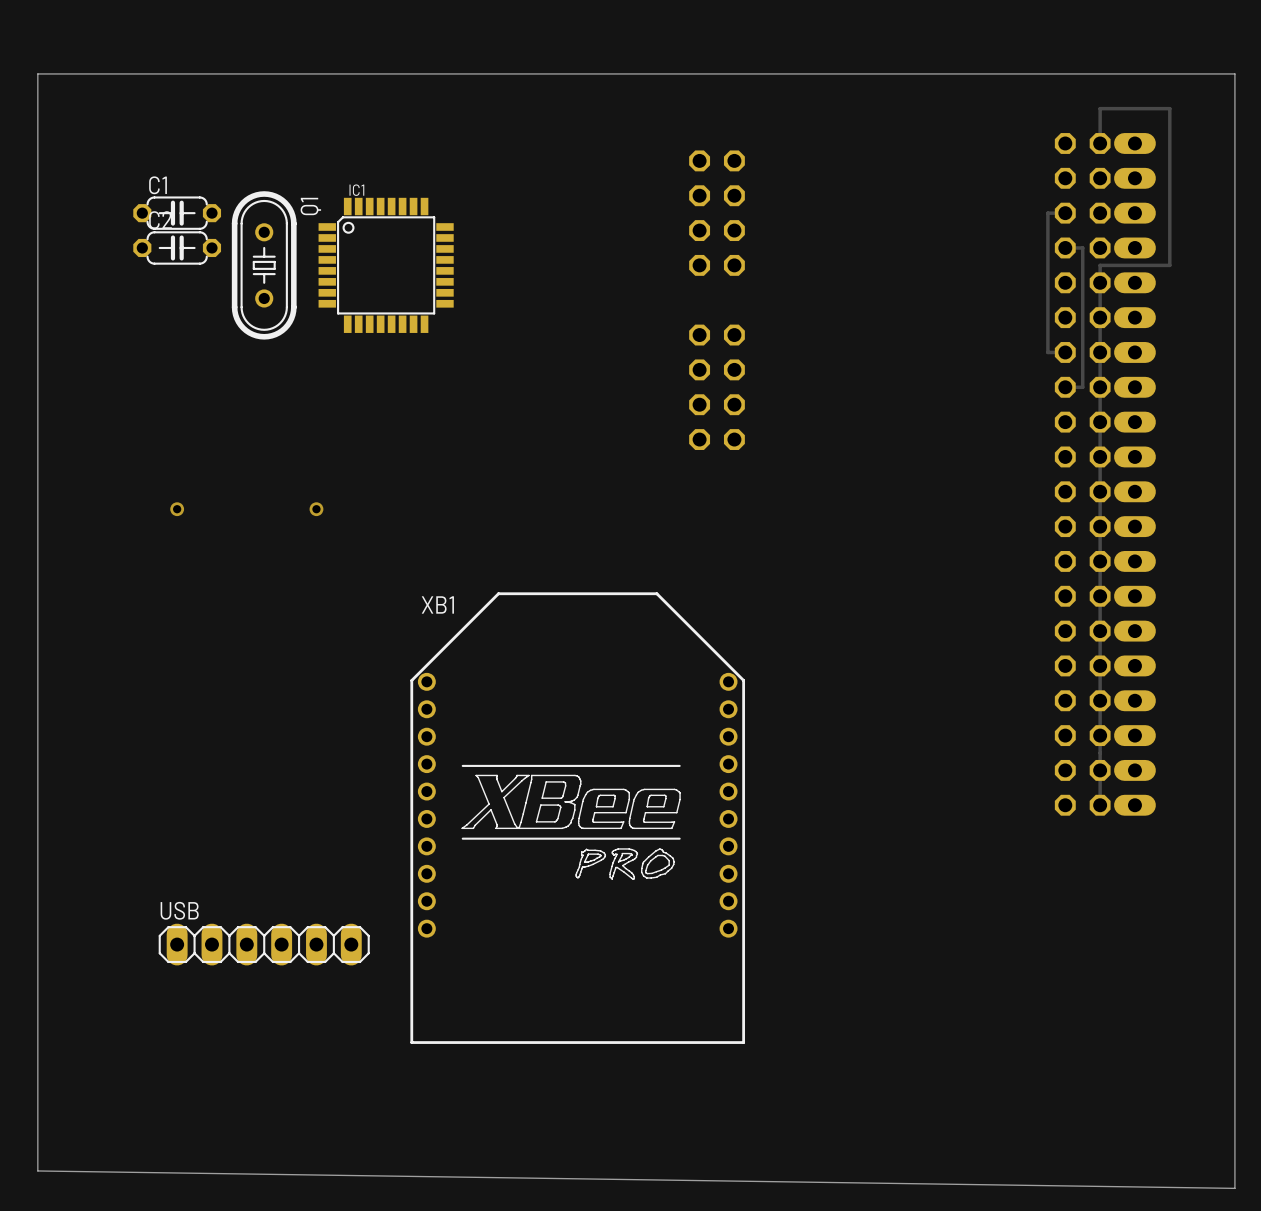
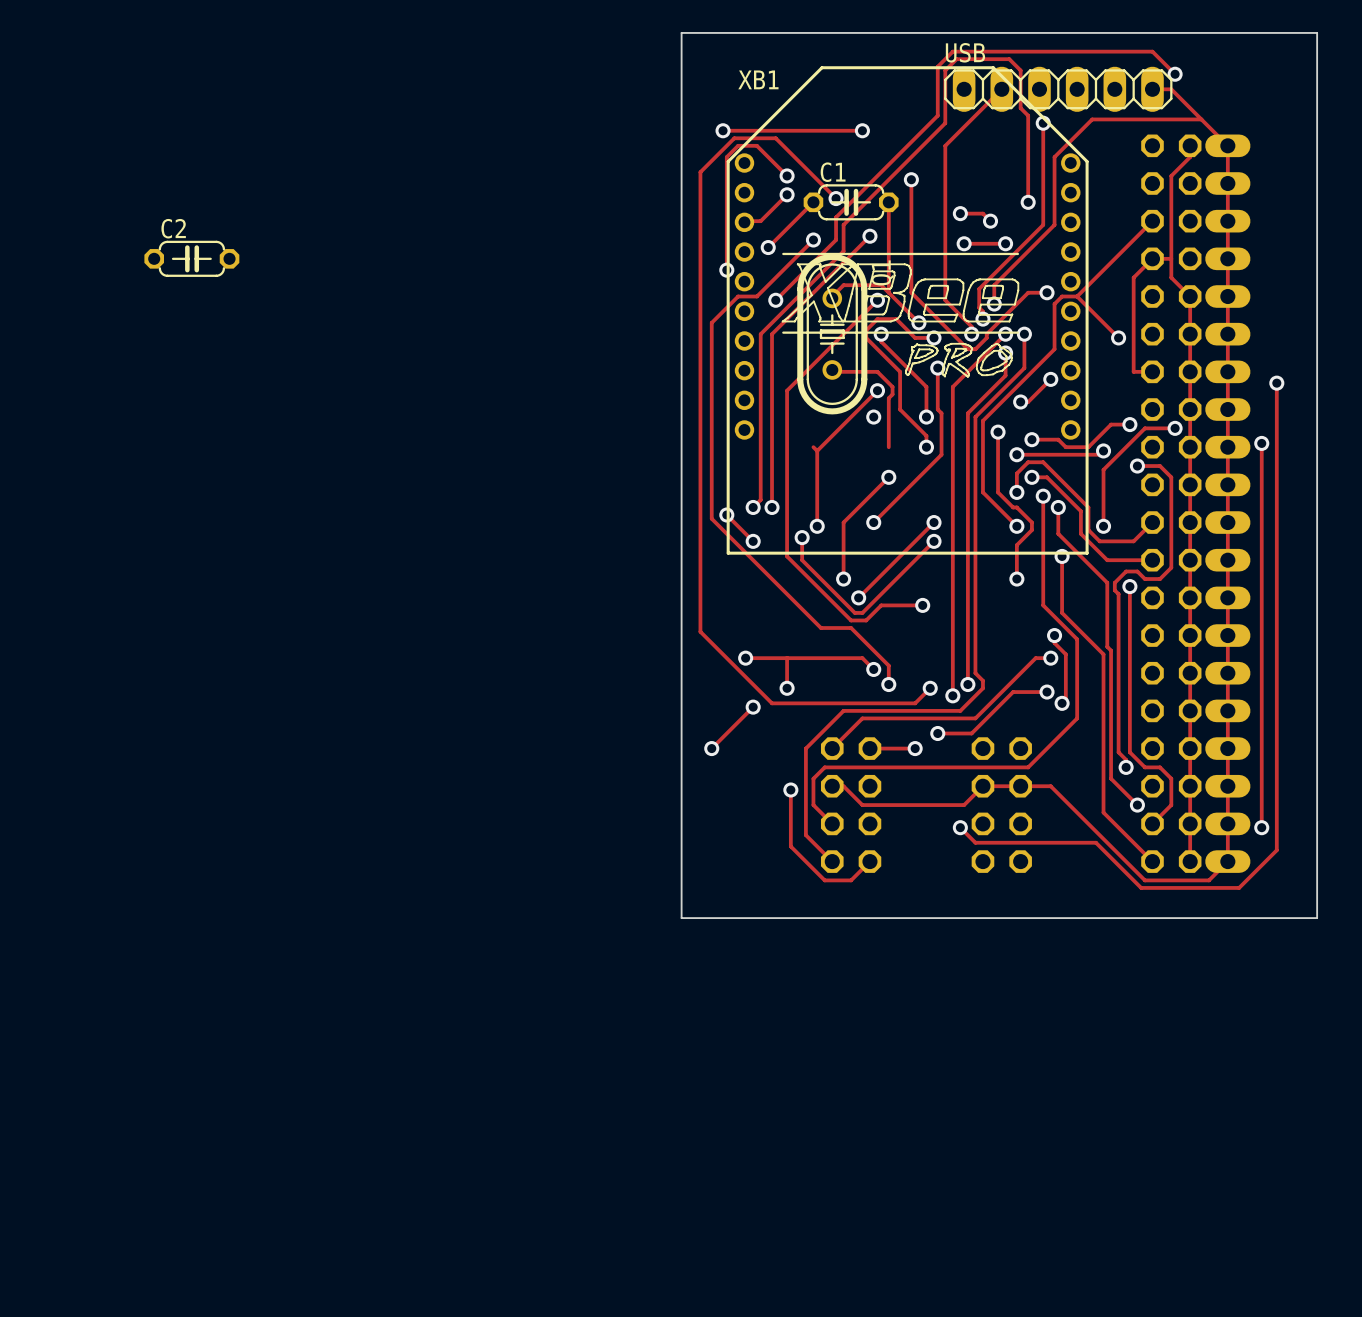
board edge: none -> (681, 32) (1317, 32) (1317, 918) (681, 918) (681, 32)
board edge: (37, 73) (1234, 73) (1234, 1188) (37, 1170) (37, 73) -> none
track: none -> (1175, 74) (1152, 51) (952, 51) (937, 66) (937, 115) (836, 217) (836, 240) (775, 300)
via: none -> (1175, 74)
track: none -> (1001, 89) (945, 145) (945, 300) (971, 326) (971, 334)
USB: none -> (1058, 89)
track: none -> (1152, 89) (1171, 89) (1227, 145) (1227, 861) (1209, 880) (1144, 880) (1050, 786) (982, 786) (964, 805) (862, 805) (843, 786) (832, 786)
track: none -> (1201, 119) (1092, 119) (1054, 157) (1054, 224) (994, 285) (994, 304)
track: none -> (1043, 123) (1043, 224) (979, 288) (979, 307) (982, 311) (982, 319)
via: none -> (1043, 123)
track: none -> (723, 130) (862, 130)
via: none -> (723, 130)
via: none -> (862, 130)
track: (1100, 143) (1100, 108) (1169, 108) (1169, 265) (1100, 265) (1100, 282) -> (1190, 145) (1190, 157) (1171, 175) (1171, 258)
track: none -> (787, 175) (756, 145) (738, 145) (726, 157) (726, 270)
via: none -> (787, 175)
track: none -> (911, 179) (911, 292) (967, 349) (975, 349) (986, 337) (986, 334) (1028, 292) (1047, 292)
via: none -> (911, 179)
track: none -> (787, 194) (760, 221) (744, 222)
via: none -> (787, 194)
track: none -> (836, 198) (775, 138) (734, 138) (700, 172) (700, 631) (772, 703) (915, 703) (930, 688)
via: none -> (836, 198)
track: none -> (813, 202) (768, 247)
track: none -> (888, 202) (888, 292)
track: none -> (1028, 202) (1028, 115) (1020, 108) (1020, 70) (1009, 59) (956, 59) (945, 70) (945, 123) (843, 224) (843, 251) (760, 334) (760, 499) (753, 507)
via: none -> (1028, 202)
track: none -> (960, 213) (982, 213) (990, 221)
via: none -> (960, 213)
C1 position: (177, 213) -> (851, 202)
part: (717, 213) -> none
via: none -> (990, 221)
track: (1065, 213) (1047, 213) (1047, 265) -> (1152, 258) (1133, 277)
track: none -> (1152, 221) (1077, 296)
track: none -> (869, 236) (772, 334) (772, 507)
via: none -> (869, 236)
track: none -> (813, 240) (756, 296) (738, 296) (711, 322) (711, 518) (820, 628) (851, 628) (888, 665) (888, 684)
via: none -> (813, 240)
track: none -> (964, 243) (1005, 243)
via: none -> (964, 243)
via: none -> (1005, 243)
via: none -> (768, 247)
via: none -> (726, 270)
Q1 position: (264, 265) -> (832, 334)
IC1: (386, 265) -> none
track: (1082, 265) (1082, 387) (1065, 387) -> (1171, 277) (1190, 296)
via: none -> (1047, 292)
track: none -> (1077, 296) (1062, 296) (1054, 304) (1054, 349) (982, 420) (982, 492) (1016, 526)
track: none -> (1077, 296) (1118, 337)
track: none -> (832, 298) (843, 285) (881, 285) (918, 322)
via: none -> (775, 300)
track: none -> (877, 300) (787, 390) (787, 556) (851, 620) (866, 620) (881, 605) (922, 605)
via: none -> (877, 300)
via: none -> (994, 304)
via: none -> (982, 319)
via: none -> (918, 322)
track: none -> (881, 334) (881, 341) (926, 386) (926, 417)
via: none -> (881, 334)
via: none -> (971, 334)
track: none -> (1005, 334) (952, 386) (952, 695)
via: none -> (1005, 334)
track: none -> (1024, 334) (1024, 368) (975, 417) (975, 673) (982, 680) (982, 688) (960, 710) (843, 710) (805, 748) (805, 835) (832, 861)
via: none -> (1024, 334)
track: none -> (934, 337) (915, 337) (896, 319) (877, 319) (866, 330) (866, 337) (900, 371) (900, 409) (926, 435) (926, 447)
via: none -> (934, 337)
via: none -> (1118, 337)
track: none -> (1005, 353) (1005, 375) (967, 413) (967, 684)
via: none -> (1005, 353)
track: none -> (937, 368) (937, 409) (941, 413) (941, 454) (873, 522)
via: none -> (937, 368)
track: none -> (832, 369) (832, 371) (877, 371) (892, 386) (892, 394) (888, 398) (888, 447)
track: none -> (1050, 379) (1028, 401) (1020, 401)
via: none -> (1050, 379)
track: none -> (1276, 383) (1276, 850) (1239, 887) (1141, 887) (1095, 842) (975, 842) (960, 827)
via: none -> (1276, 383)
track: none -> (877, 390) (817, 450)
via: none -> (877, 390)
via: none -> (1020, 401)
part: (717, 387) -> none
via: none -> (873, 417)
via: none -> (926, 417)
track: none -> (1129, 424) (1111, 424) (1088, 447) (1065, 447) (1058, 439) (1031, 439)
via: none -> (1129, 424)
track: none -> (1175, 428) (1144, 428) (1103, 469) (1103, 526)
via: none -> (1175, 428)
track: none -> (998, 432) (998, 492) (1031, 522) (1031, 530) (1016, 545) (1016, 579)
via: none -> (998, 432)
via: none -> (1031, 439)
track: none -> (1261, 443) (1261, 827)
via: none -> (1261, 443)
track: none -> (813, 447) (817, 450)
via: none -> (926, 447)
track: none -> (817, 450) (817, 526)
track: none -> (1103, 450) (1099, 454) (1016, 454)
via: none -> (1103, 450)
via: none -> (1016, 454)
track: none -> (1137, 466) (1160, 466) (1171, 477) (1171, 567) (1160, 579) (1144, 579) (1137, 571) (1126, 571) (1114, 582) (1114, 590) (1118, 594) (1118, 752) (1126, 759) (1126, 767)
via: none -> (1137, 466)
track: none -> (888, 477) (843, 522) (843, 579)
via: none -> (888, 477)
track: none -> (1031, 477) (1047, 477) (1080, 511) (1080, 533) (1107, 560) (1152, 560)
via: none -> (1031, 477)
track: none -> (1016, 492) (1016, 473) (1028, 462) (1043, 462) (1088, 507) (1088, 530) (1099, 541) (1133, 541) (1152, 522)
via: none -> (1016, 492)
track: none -> (1043, 496) (1043, 605) (1077, 639) (1077, 718) (1028, 767) (824, 767) (813, 778) (813, 805) (832, 823)
via: none -> (1043, 496)
via: none -> (753, 507)
via: none -> (772, 507)
track: none -> (1058, 507) (1058, 533) (1107, 582) (1107, 646) (1111, 650) (1111, 778) (1137, 805)
via: none -> (1058, 507)
track: none -> (726, 515) (753, 541)
via: none -> (726, 515)
via: none -> (873, 522)
track: none -> (934, 522) (858, 597)
via: none -> (934, 522)
via: none -> (817, 526)
via: none -> (1016, 526)
via: none -> (1103, 526)
track: none -> (802, 537) (802, 560) (854, 612) (862, 612) (934, 541)
via: none -> (802, 537)
via: (177, 509) -> none
via: (316, 509) -> none
via: none -> (753, 541)
via: none -> (934, 541)
track: none -> (1062, 556) (1062, 612) (1103, 654) (1103, 812) (1152, 861)
via: none -> (1062, 556)
via: none -> (843, 579)
via: none -> (1016, 579)
track: none -> (1129, 586) (1129, 752) (1144, 767) (1160, 767) (1171, 778) (1171, 805) (1152, 823)
via: none -> (1129, 586)
via: none -> (858, 597)
via: none -> (922, 605)
track: none -> (1054, 635) (1054, 643) (1065, 654) (1065, 699) (1062, 703)
via: none -> (1054, 635)
track: none -> (745, 658) (862, 658) (873, 669)
via: none -> (745, 658)
track: none -> (787, 658) (787, 688)
track: none -> (1050, 658) (1035, 658) (975, 718) (862, 718) (832, 748)
via: none -> (1050, 658)
via: none -> (873, 669)
via: none -> (888, 684)
via: none -> (967, 684)
via: none -> (787, 688)
via: none -> (930, 688)
track: none -> (1047, 692) (1013, 692) (971, 733) (937, 733)
via: none -> (1047, 692)
via: none -> (952, 695)
via: none -> (1062, 703)
track: none -> (753, 707) (711, 748)
via: none -> (753, 707)
via: none -> (937, 733)
via: none -> (711, 748)
track: none -> (869, 748) (915, 748)
via: none -> (915, 748)
via: none -> (1126, 767)
track: none -> (790, 790) (790, 846) (824, 880) (851, 880) (869, 861)
via: none -> (790, 790)
part: none -> (851, 805)
part: none -> (1001, 805)
via: none -> (1137, 805)
via: none -> (960, 827)
via: none -> (1261, 827)
XB1 position: (577, 818) -> (907, 310)
USB: (264, 944) -> none

